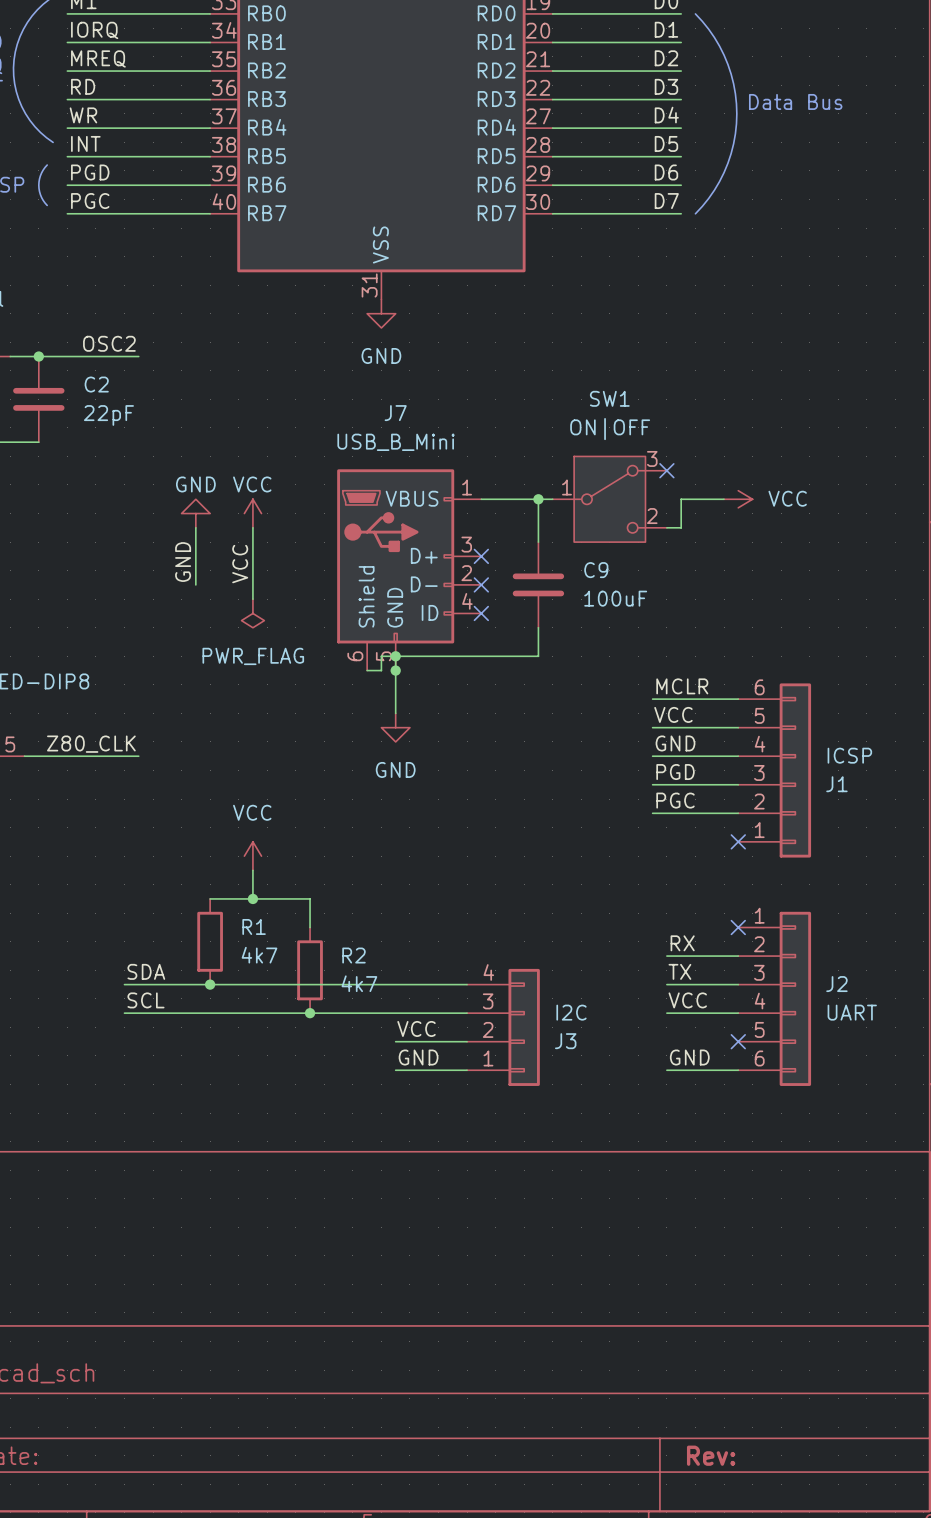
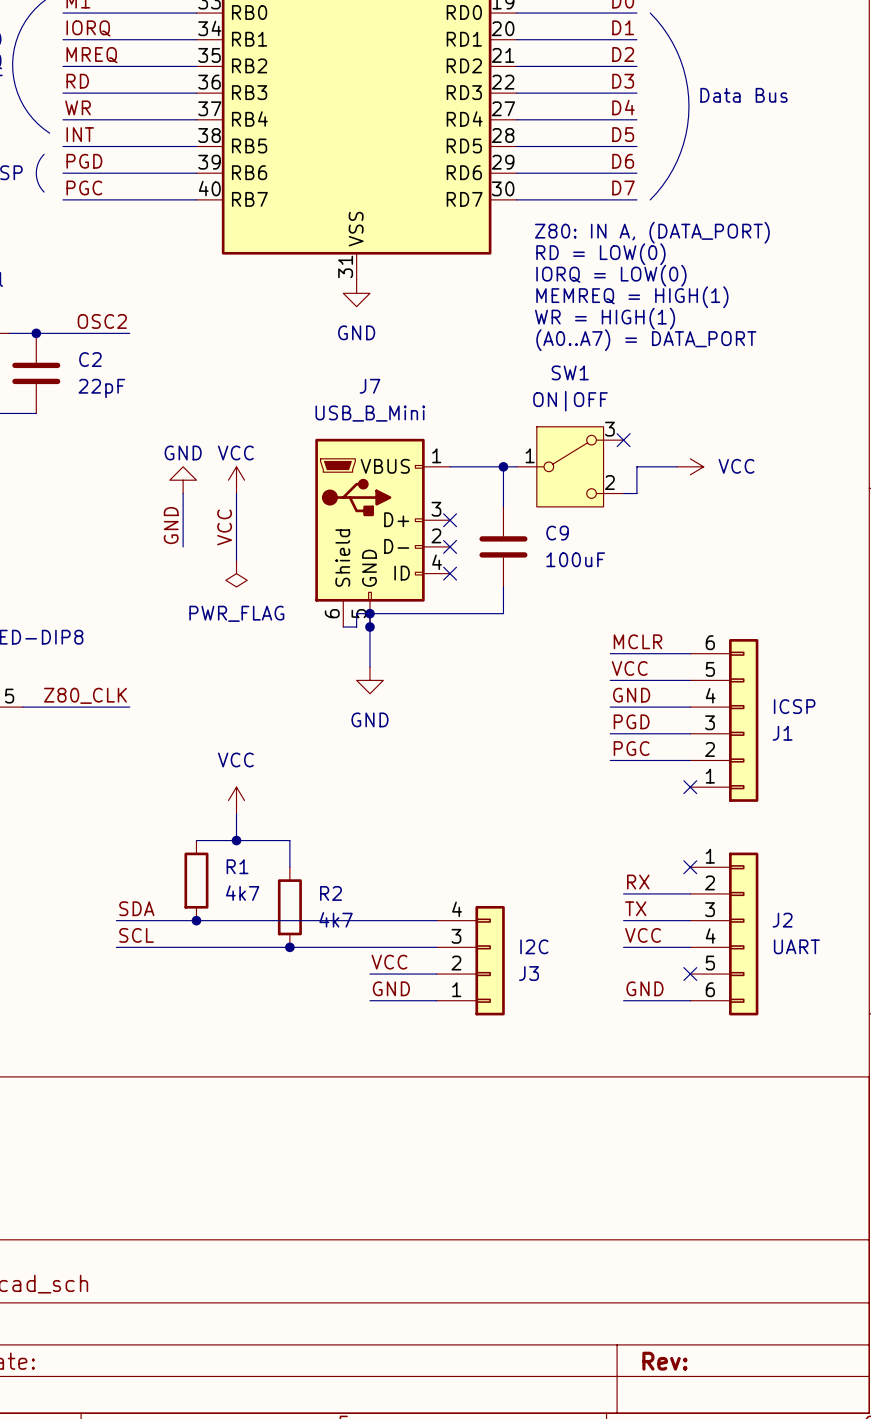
text: none -> Z80: IN A, (DATA_PORT) (652, 232)
text: none -> RD = LOW(0) (600, 254)
text: none -> IORQ = LOW(0) (611, 275)
text: none -> MEMREQ = HIGH(1) (632, 297)
text: none -> WR = HIGH(1) (605, 318)
text: none -> (A0..A7) = DATA_PORT (646, 340)

